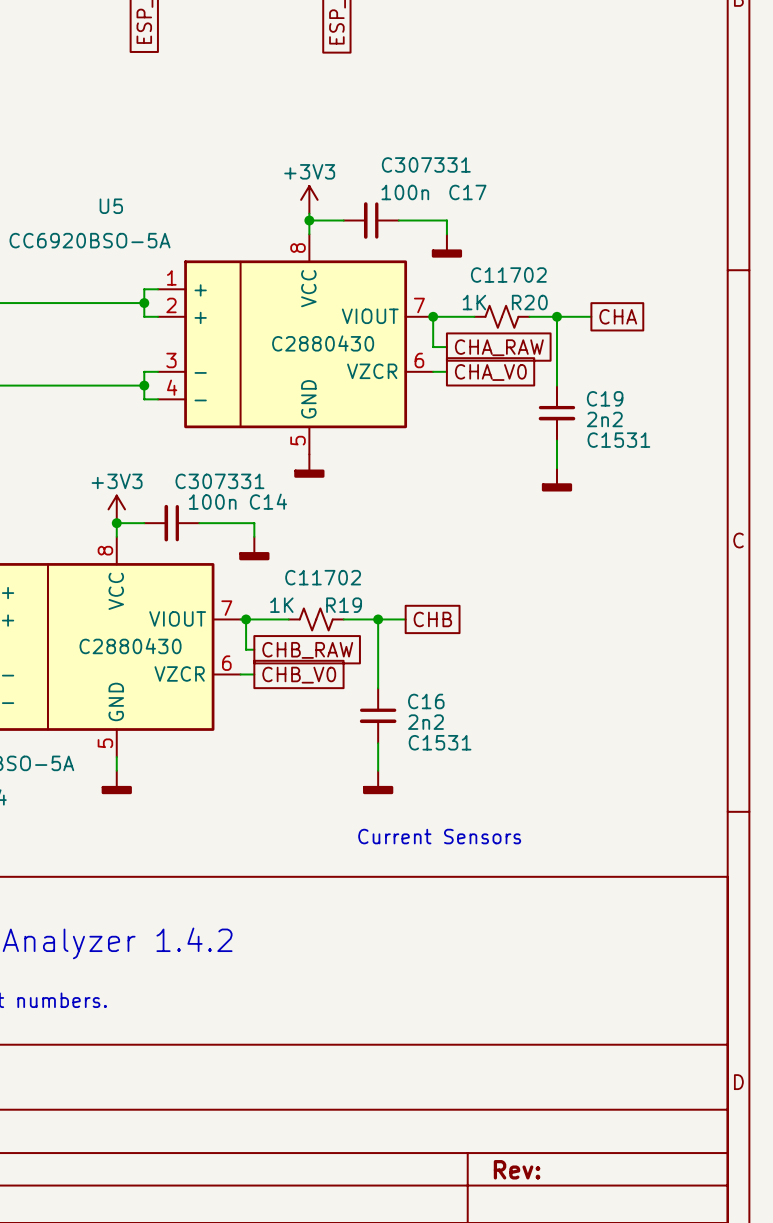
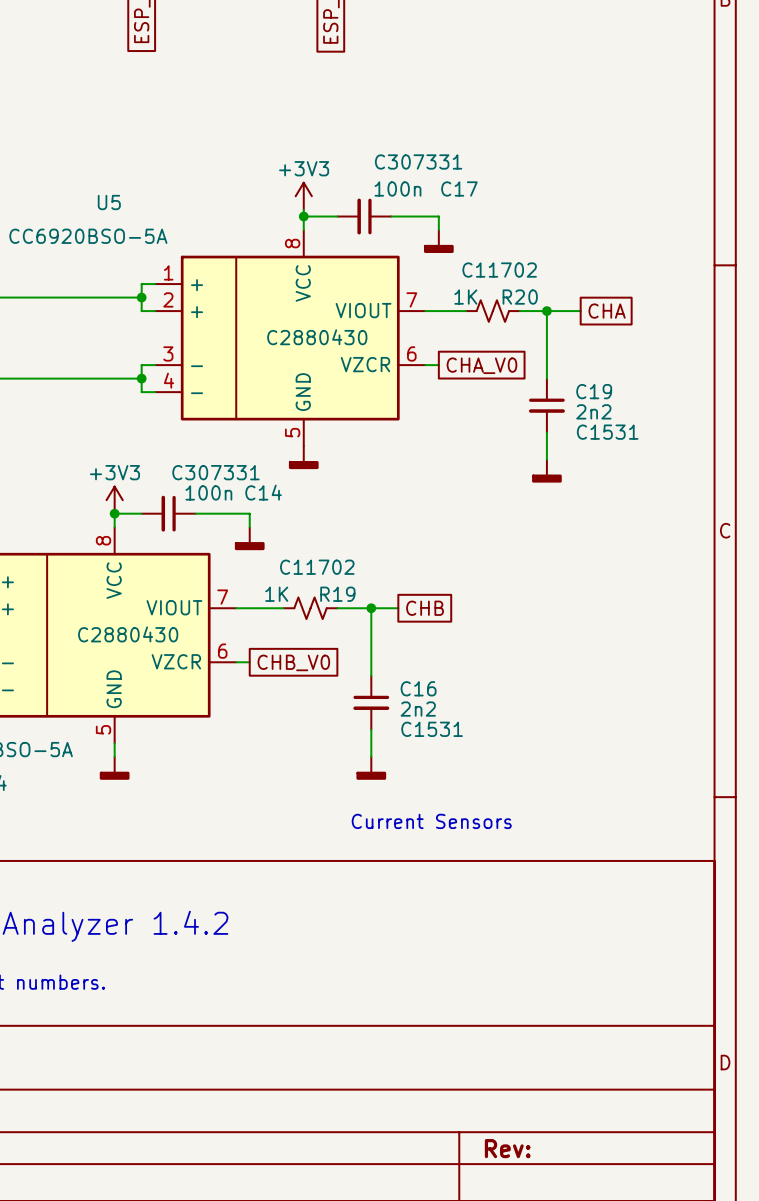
wire: (433, 316) (433, 347) (446, 347) -> none
junction: (433, 316) -> none
global label: CHA_RAW (499, 347) -> none
wire: (246, 619) (246, 649) (254, 649) -> none
junction: (246, 619) -> none
global label: CHB_RAW (307, 650) -> none

